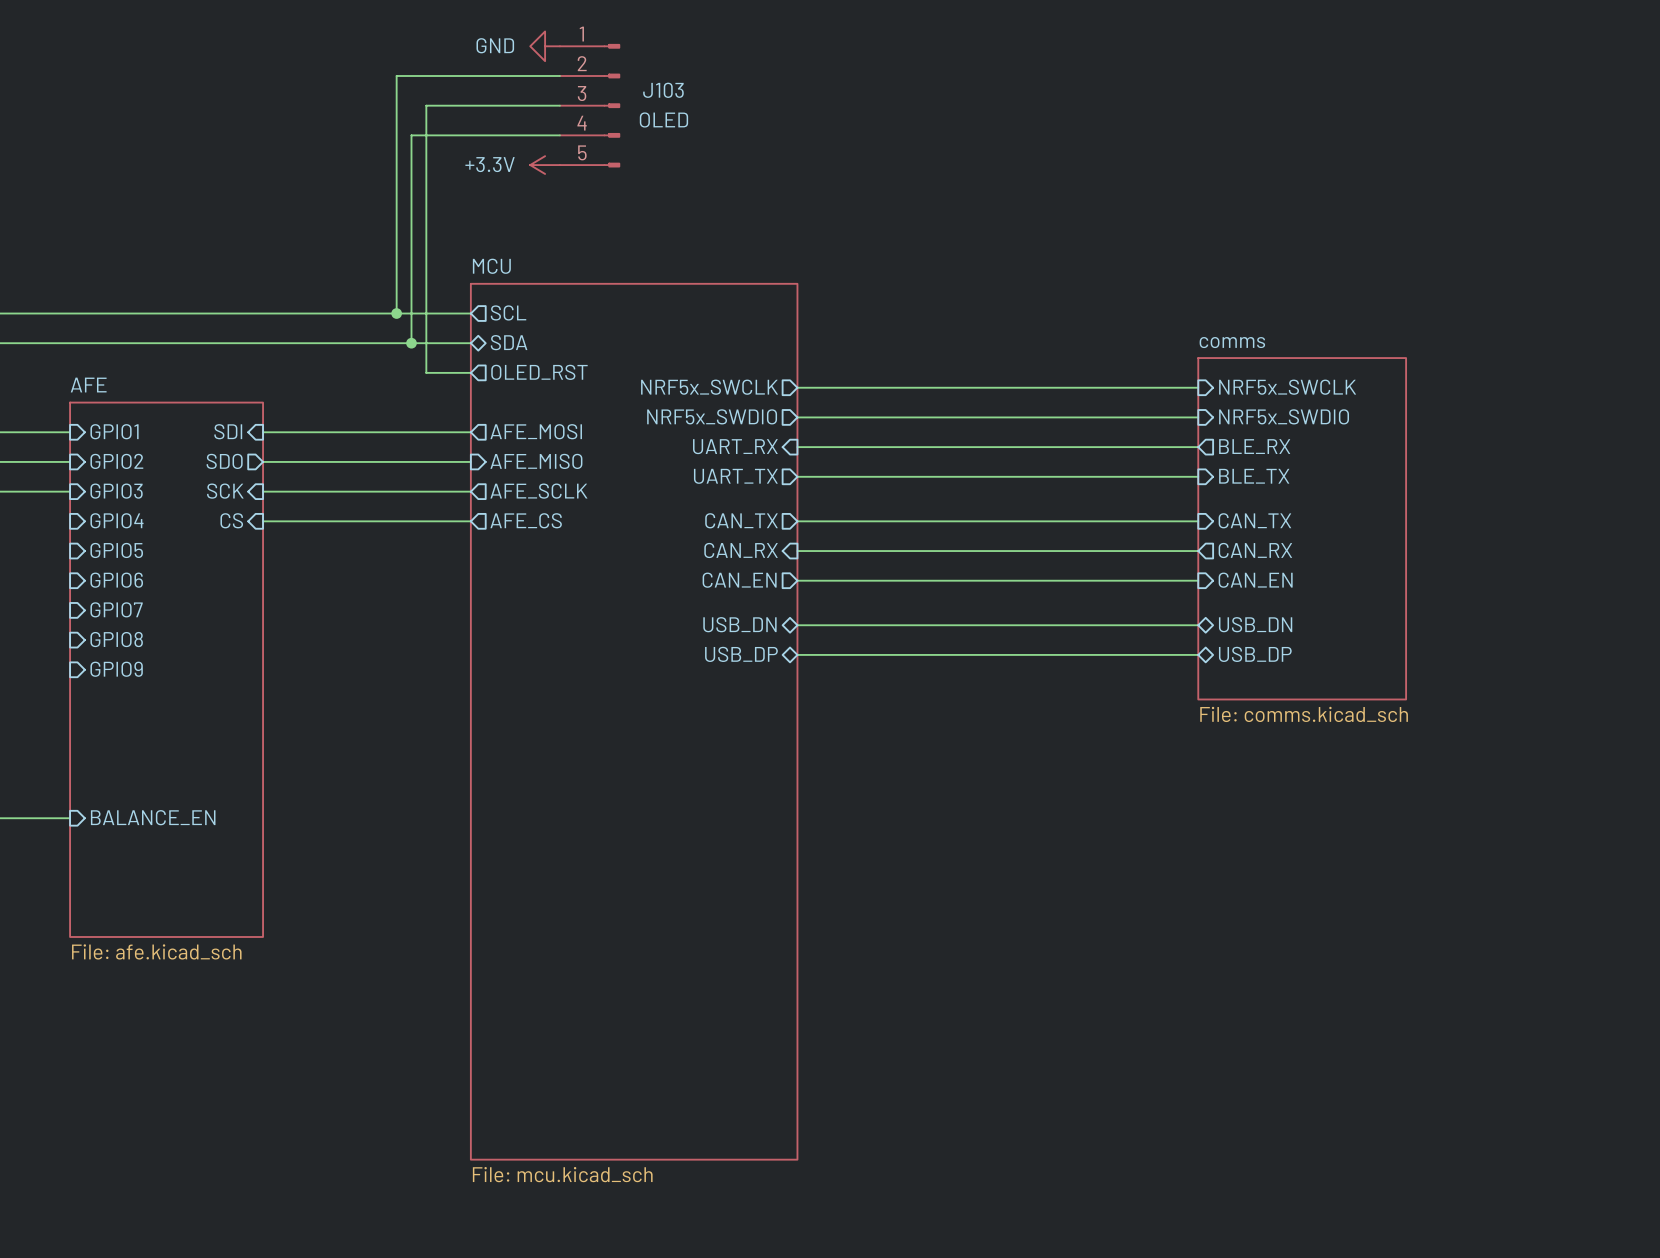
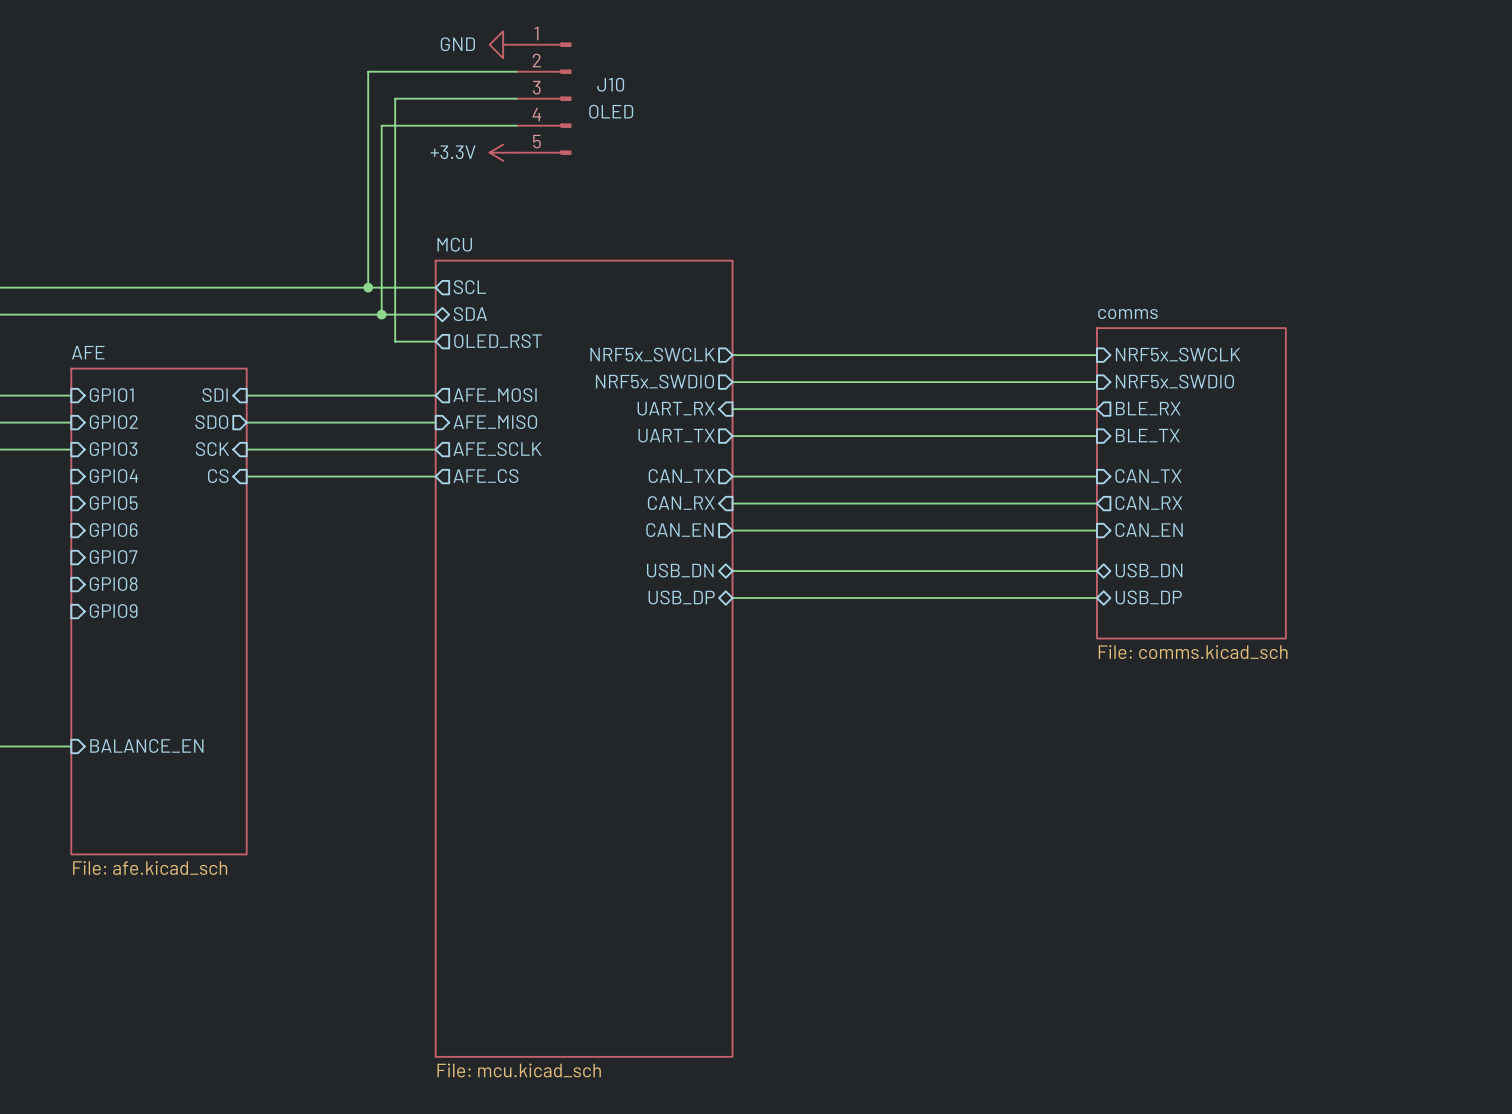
J103 name: J103 (663, 90) -> J10 (610, 84)

